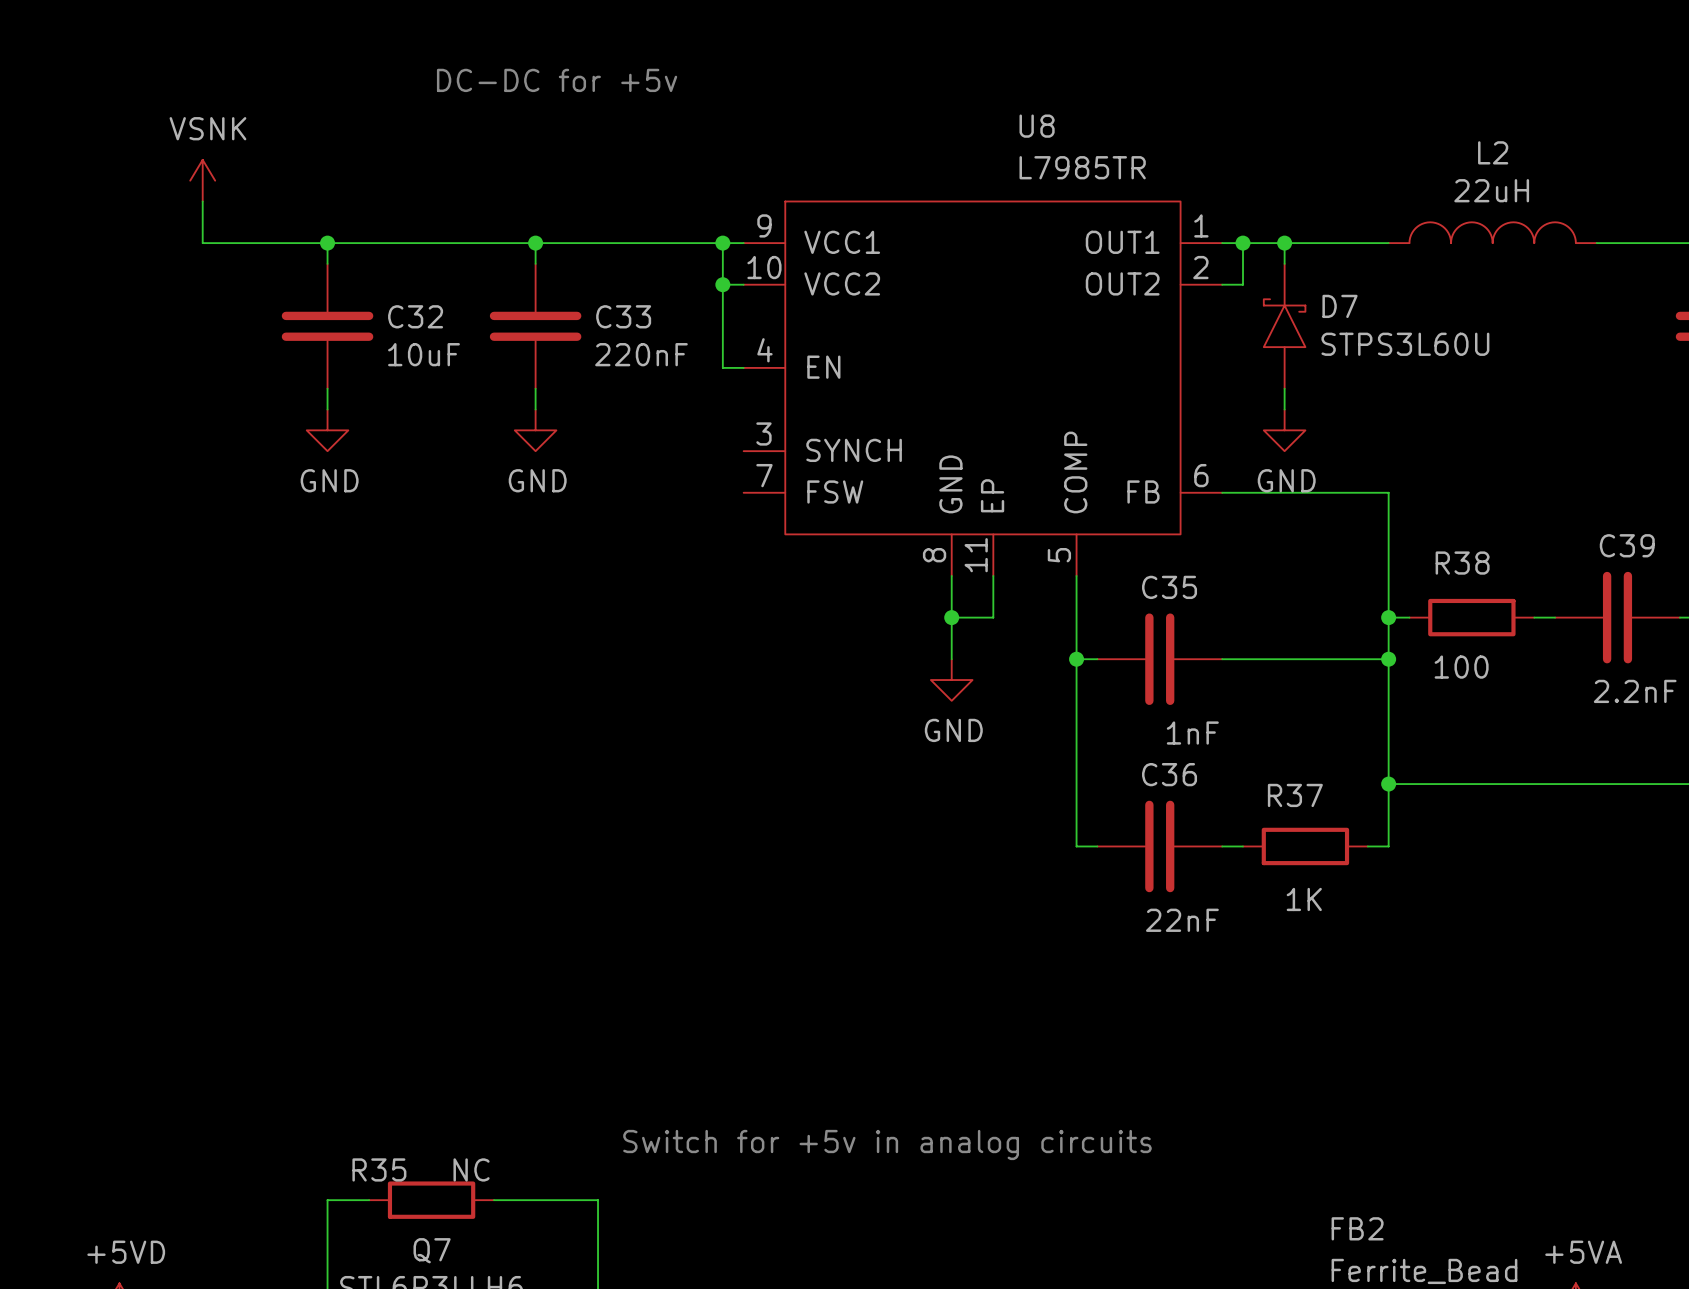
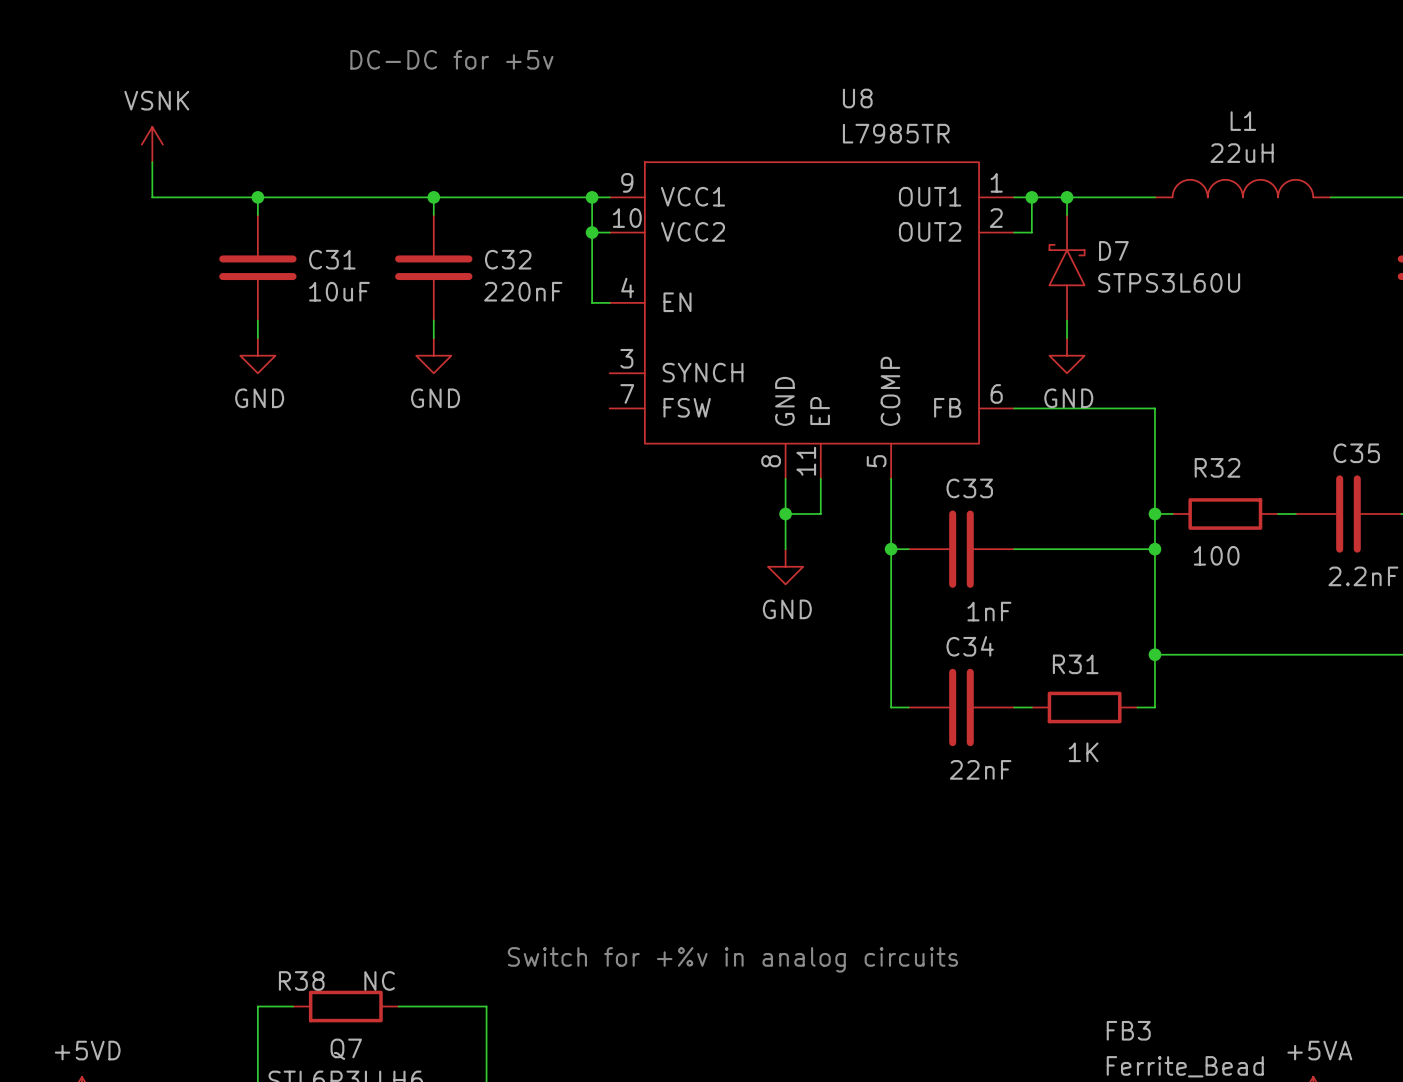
L2 name: L2 (1493, 152) -> L1 (1243, 121)
C32 name: C32 (415, 316) -> C31 (332, 259)
C33 name: C33 (623, 316) -> C32 (508, 259)
C39 name: C39 (1627, 545) -> C35 (1356, 453)
R38 name: R38 (1462, 563) -> R32 (1217, 467)
C35 name: C35 (1169, 587) -> C33 (969, 488)
C36 name: C36 (1169, 774) -> C34 (970, 646)
R37 name: R37 (1295, 795) -> R31 (1075, 664)
text: Switch for +5v in analog circuits (887, 1144) -> Switch for +%v in analog circuits (732, 959)
R35 name: R35 (379, 1169) -> R38 (301, 980)
FB2 name: FB2 (1357, 1228) -> FB3 (1128, 1030)

